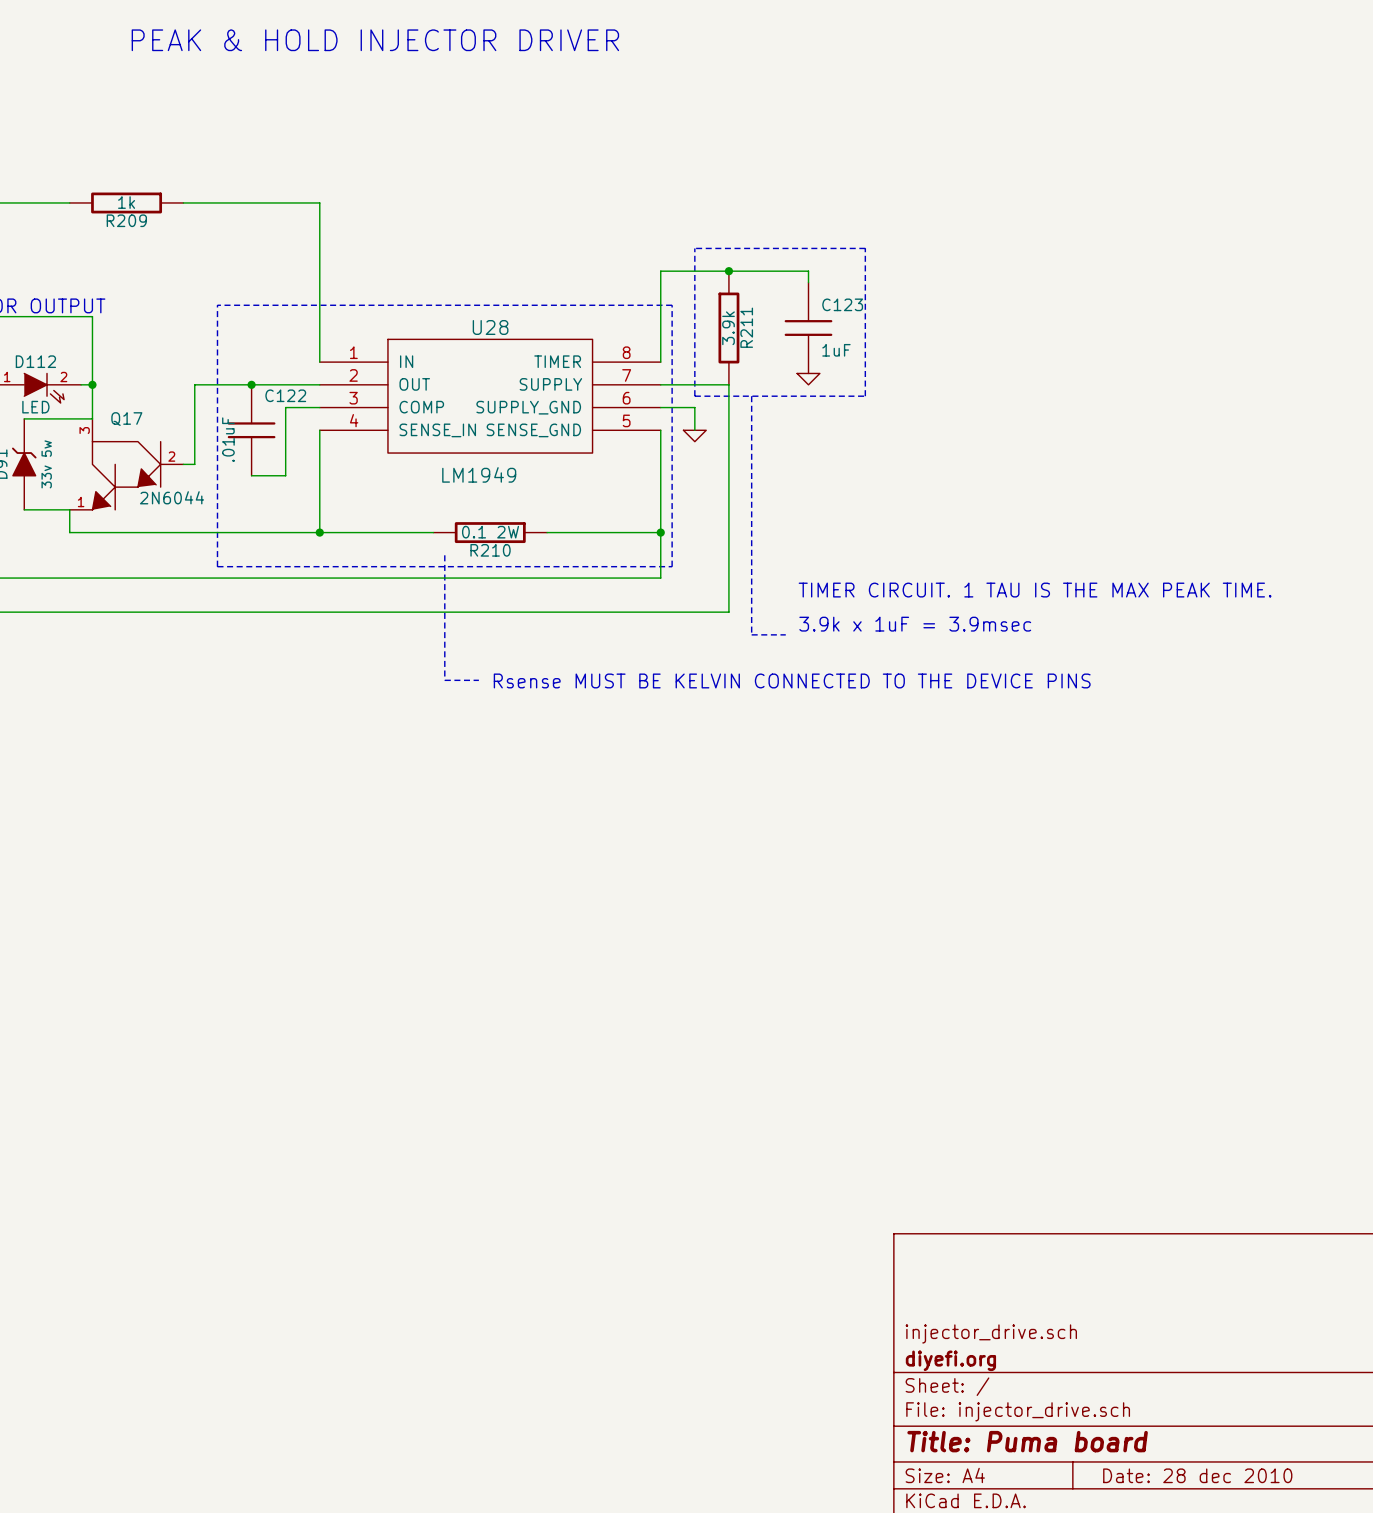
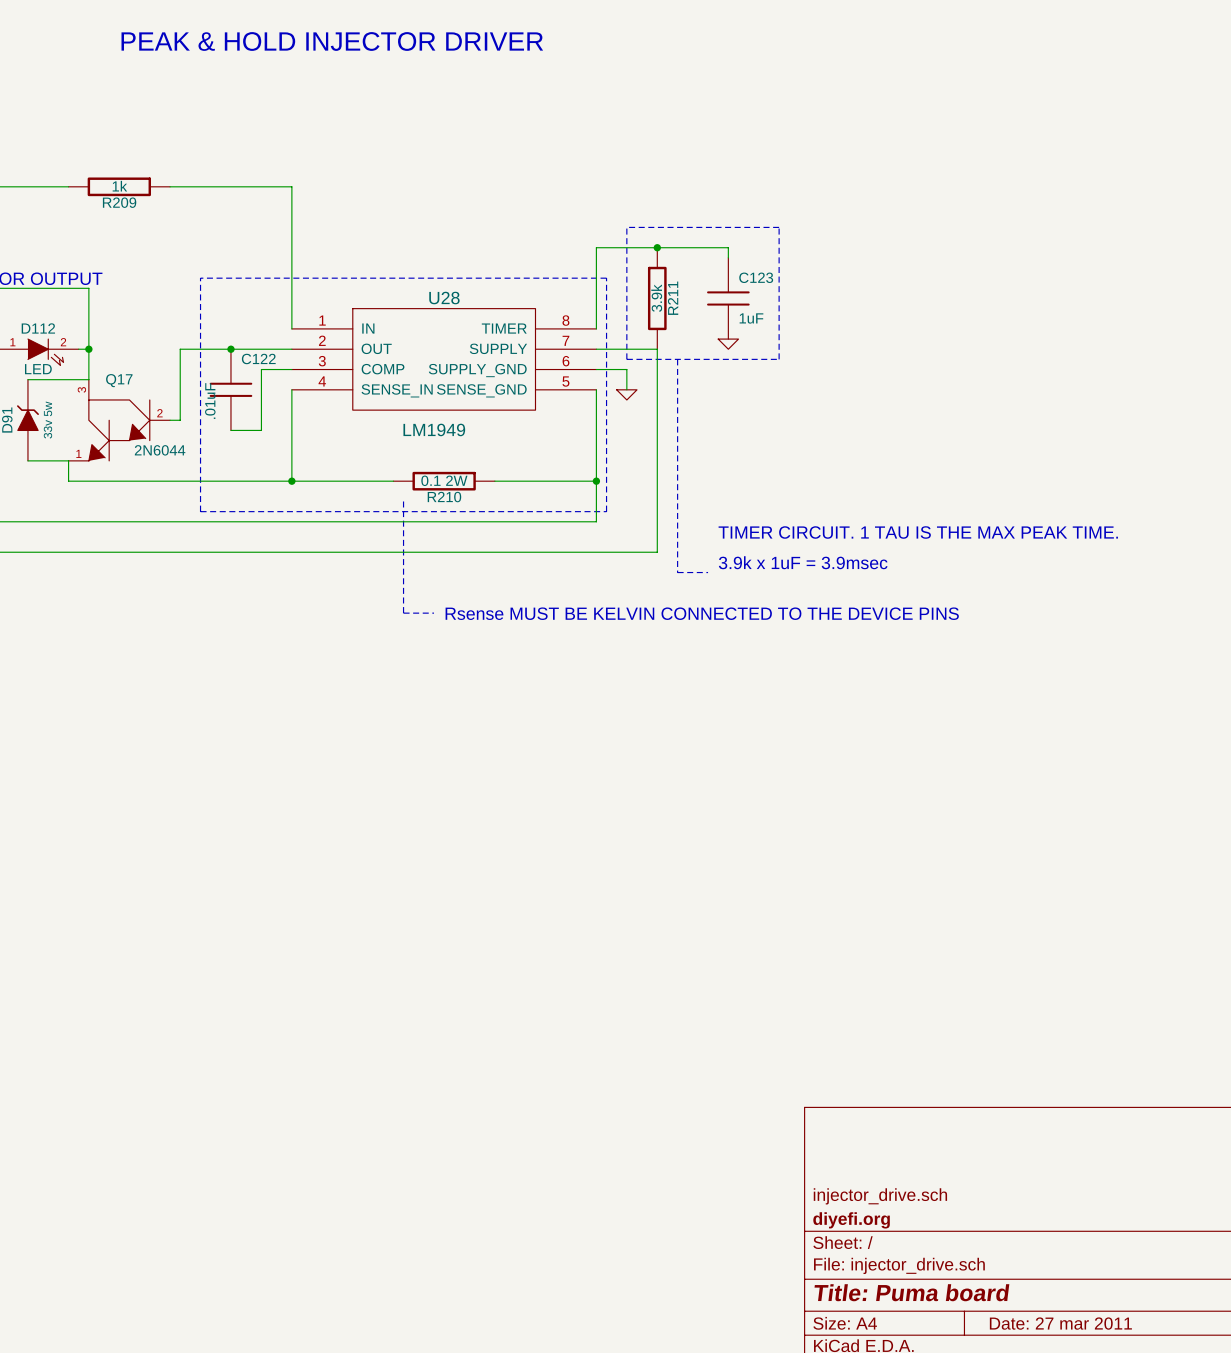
title block: Date: 28 dec 2010 (1197, 1475) -> Date: 27 mar 2011 (1060, 1323)

